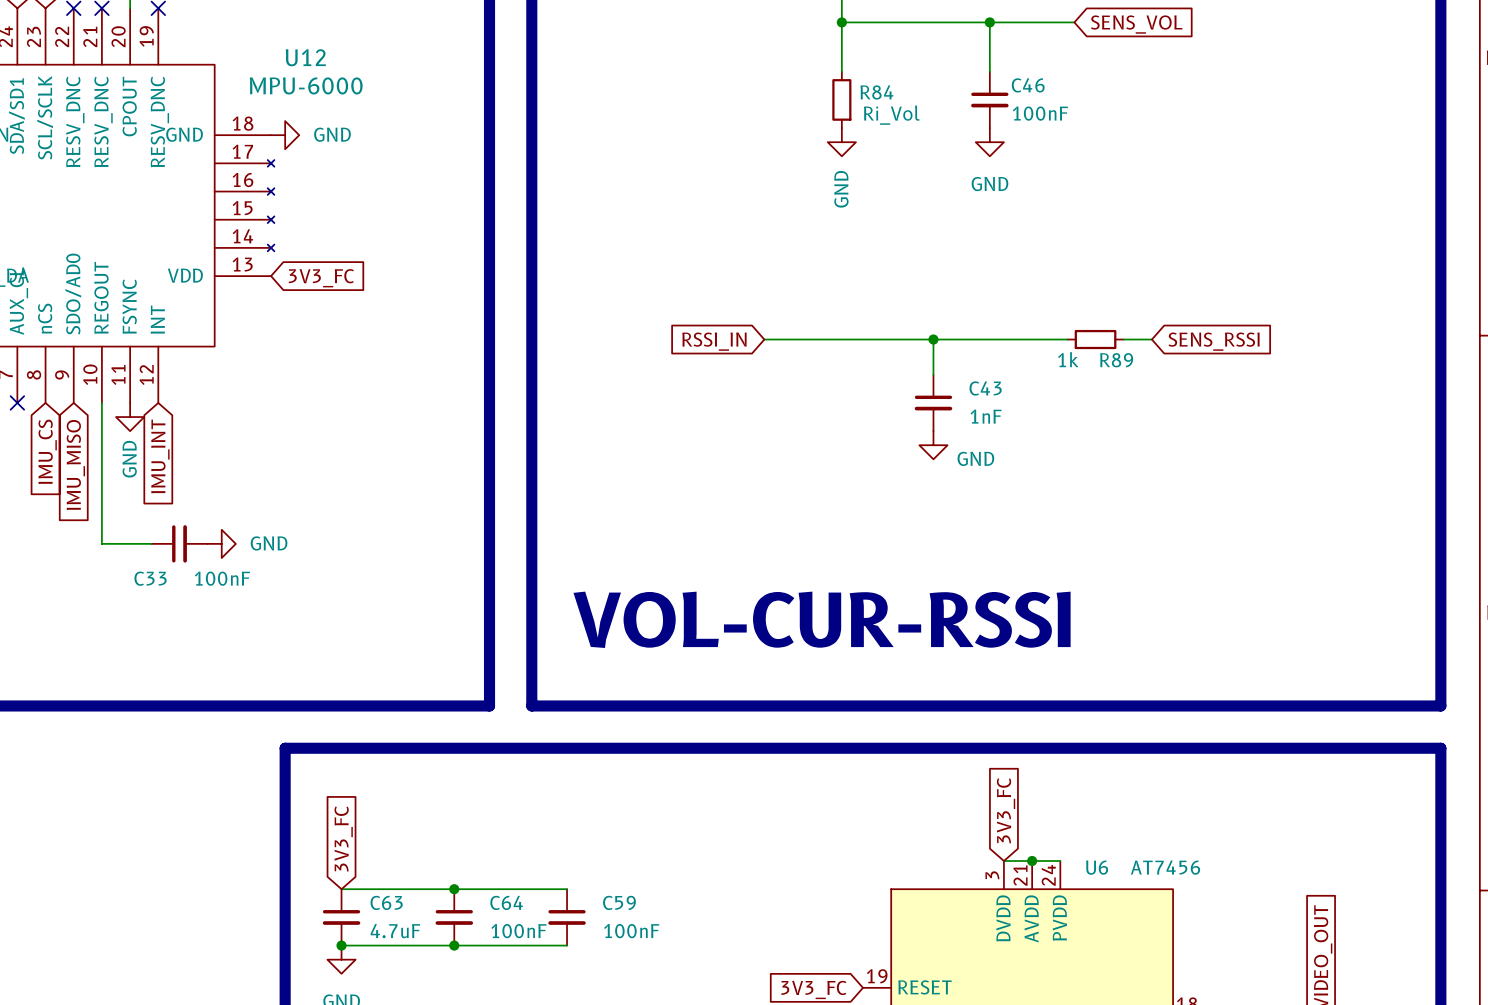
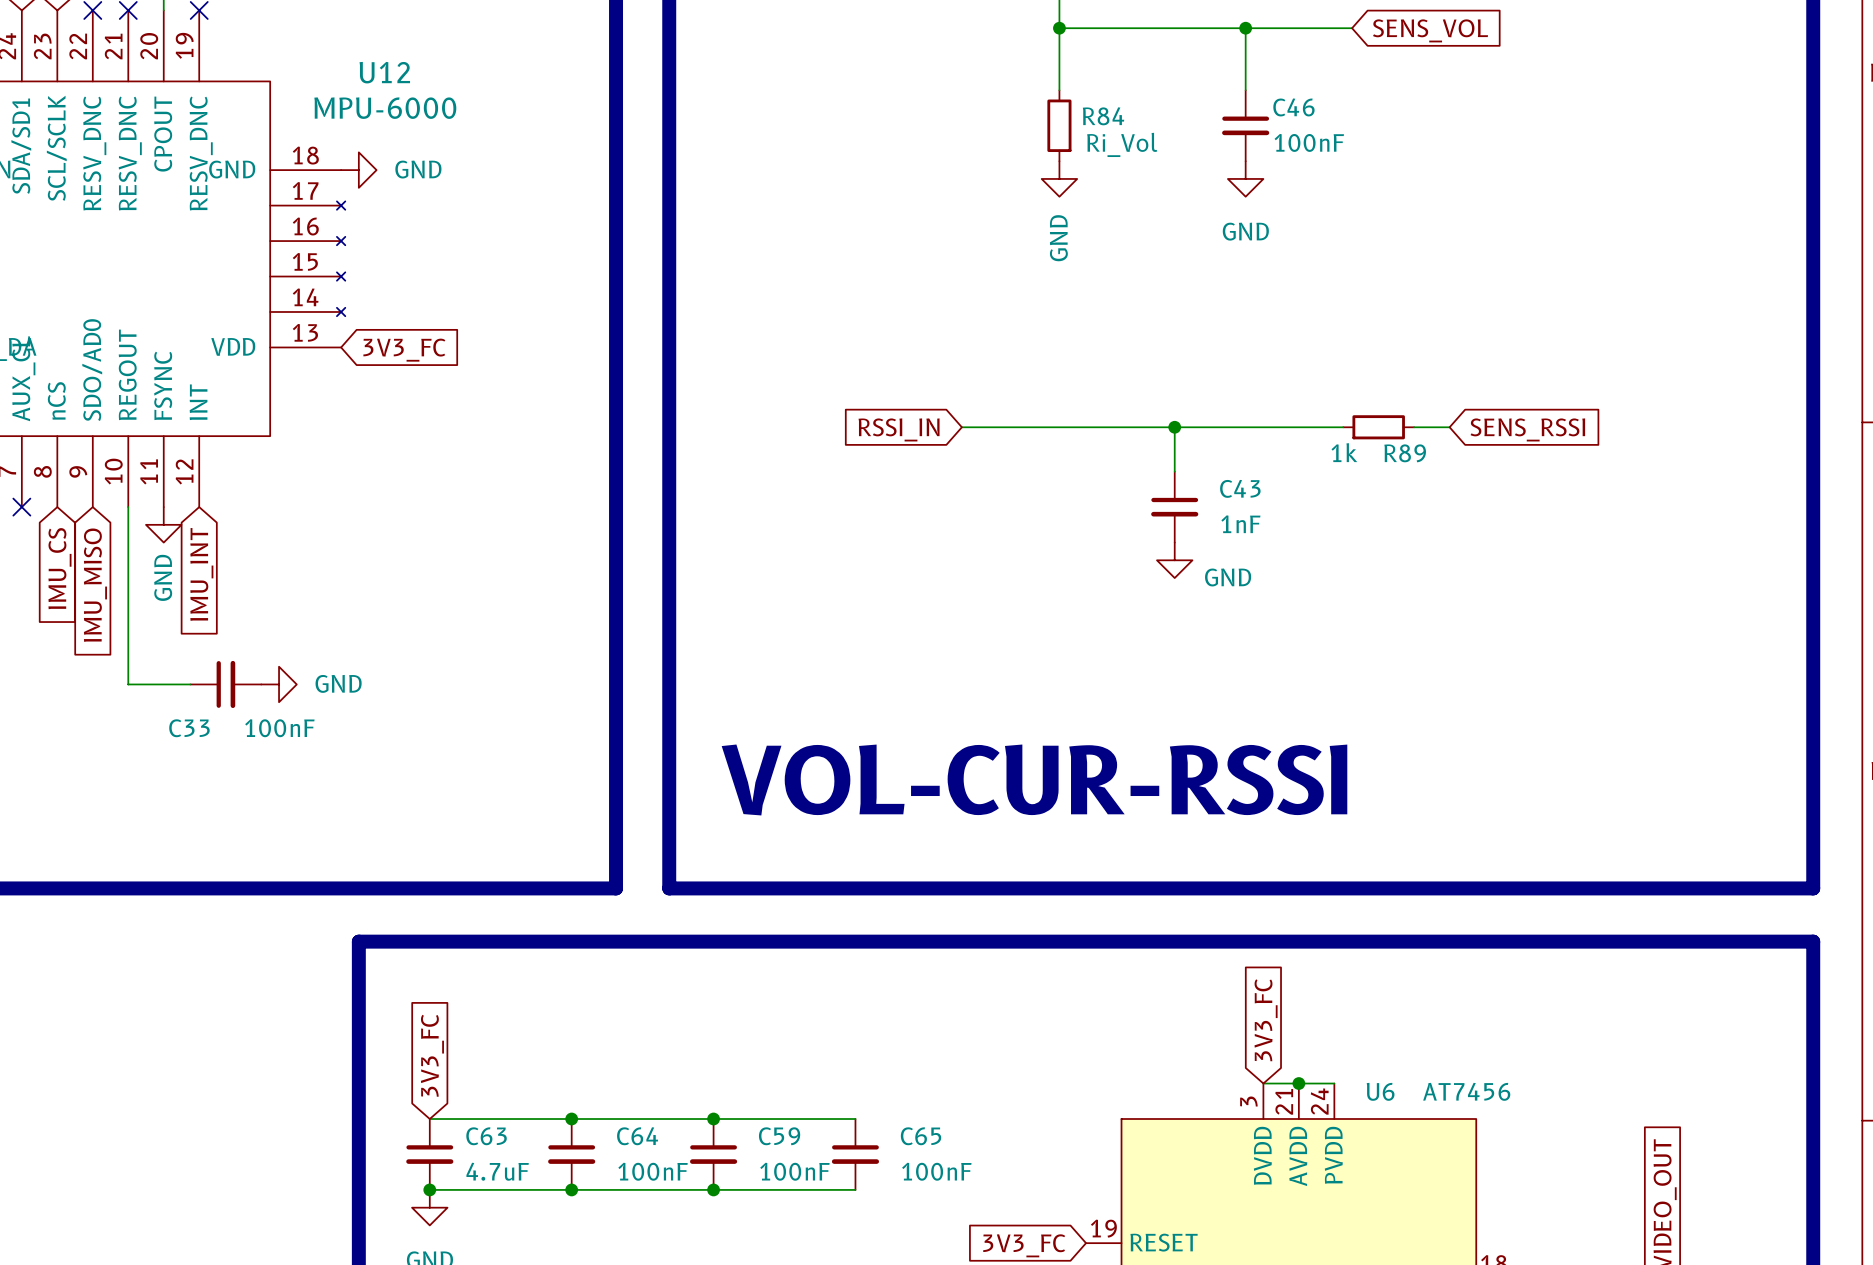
wire: none -> (713, 1119) (855, 1119)
junction: none -> (713, 1119)
C65: none -> 100nF (855, 1154)
wire: none -> (713, 1189) (855, 1189)
junction: none -> (713, 1189)

